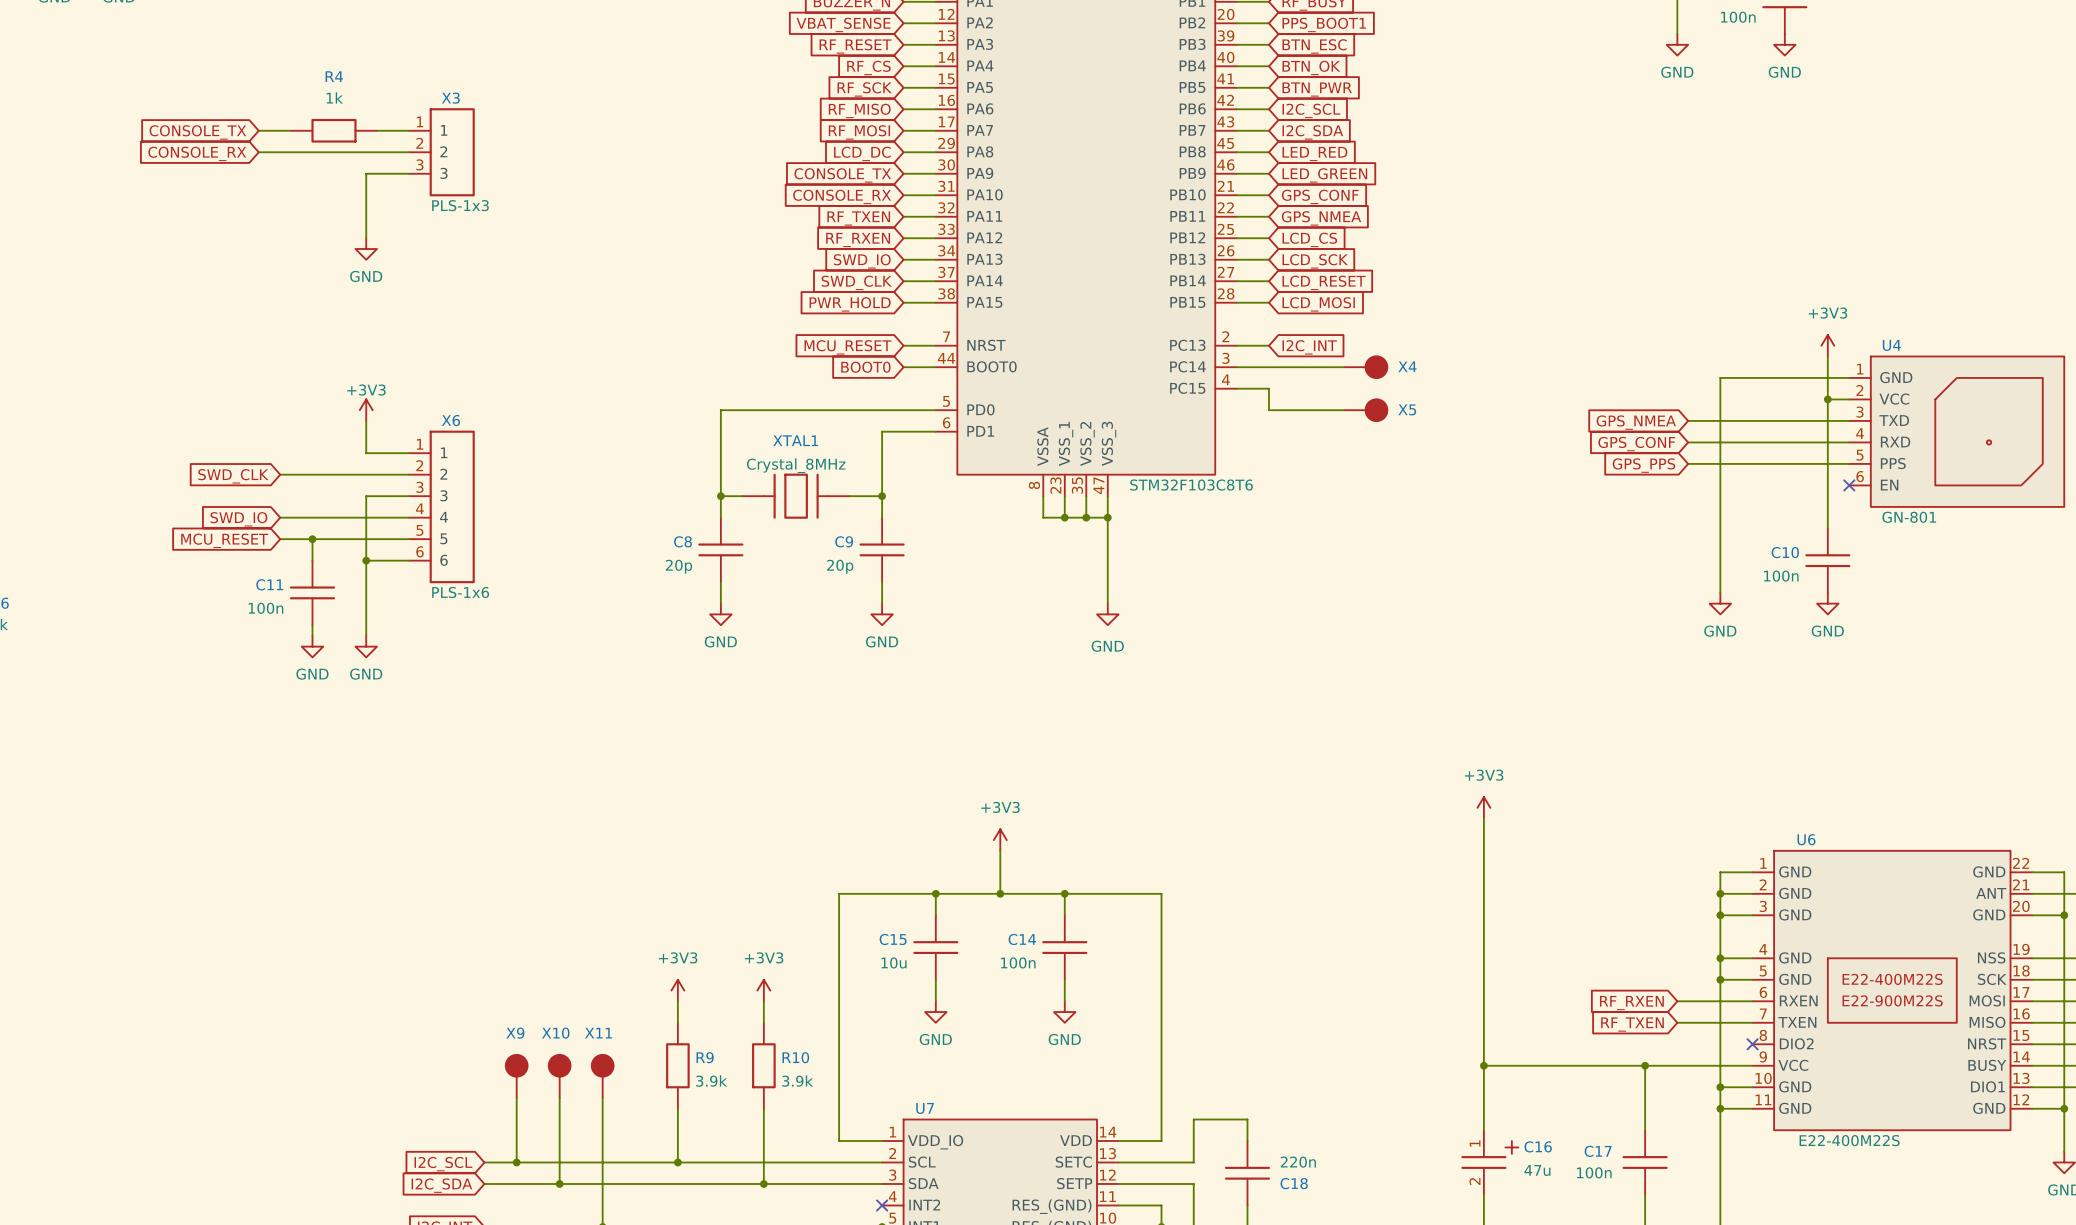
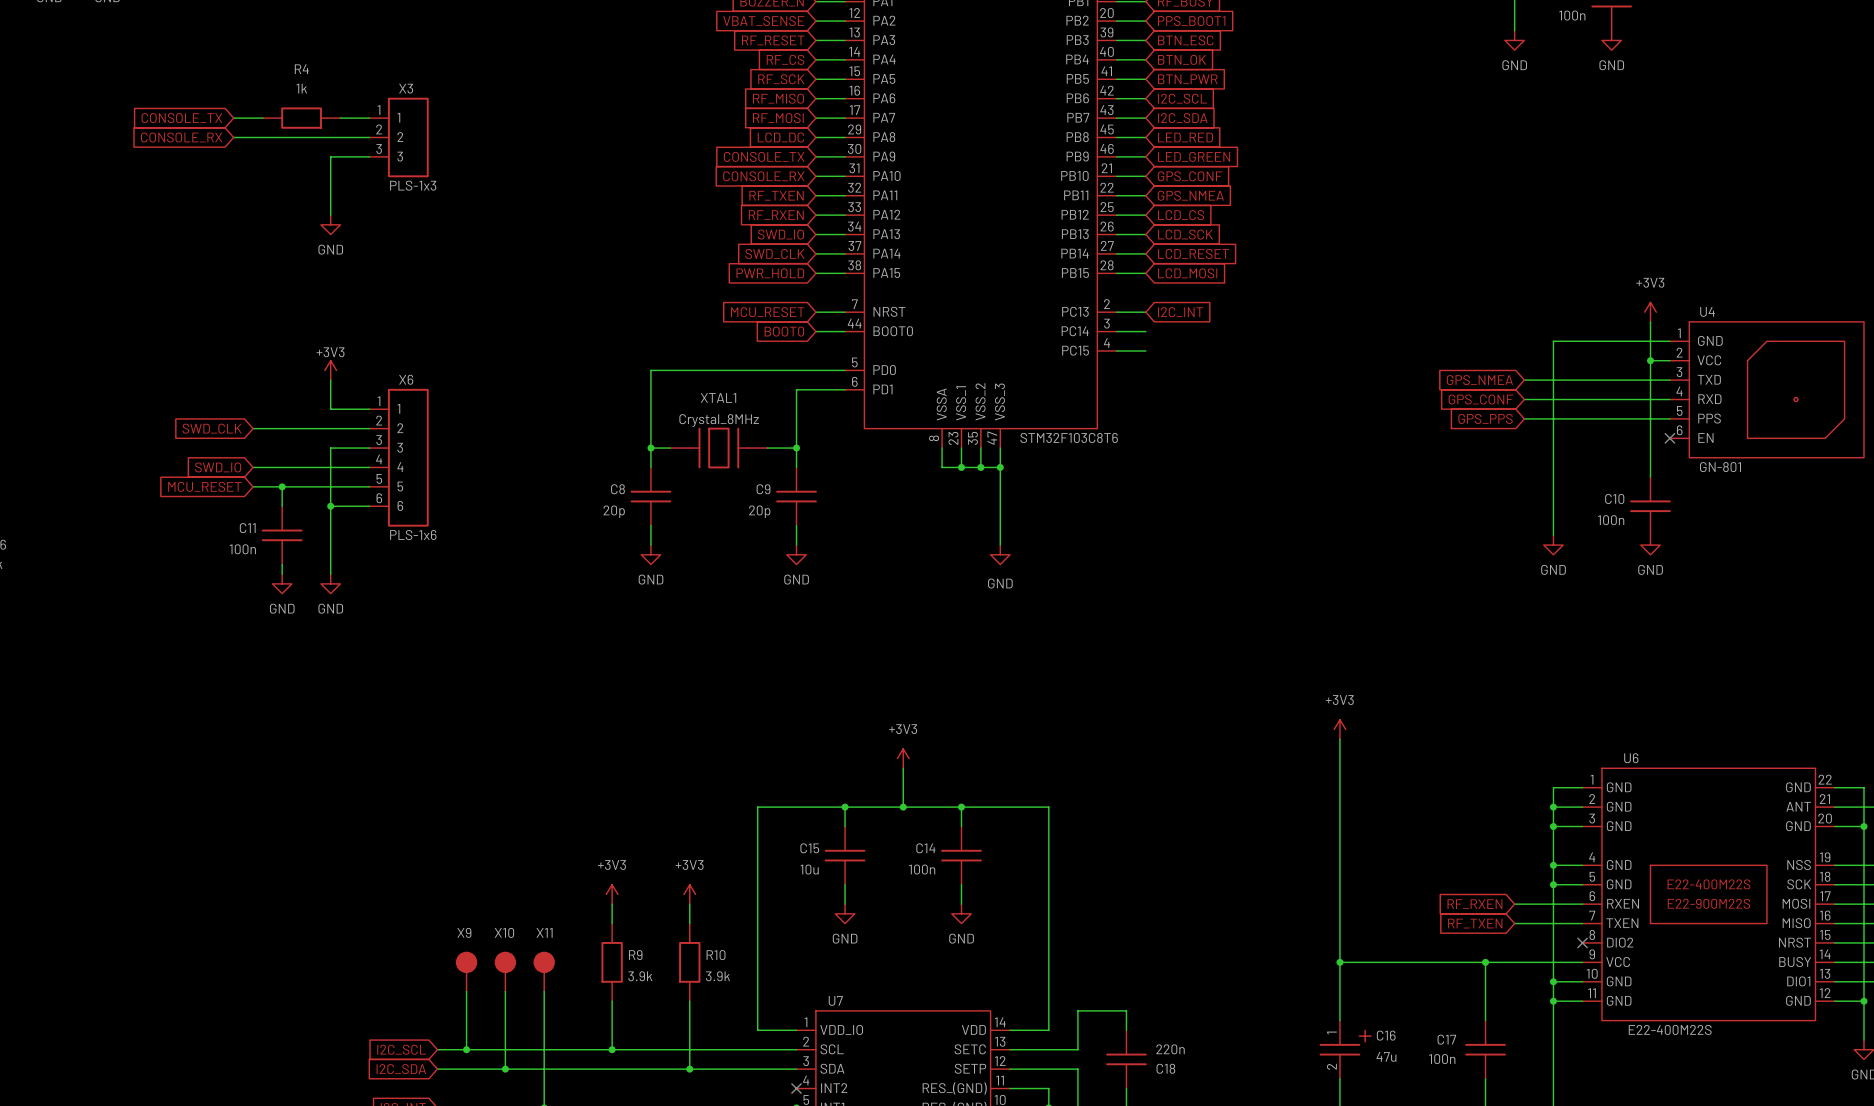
wire: (1268, 367) (1344, 367) -> none
X4: (1366, 367) -> none
wire: (1268, 388) (1268, 410) (1344, 410) -> none
X5: (1366, 410) -> none

